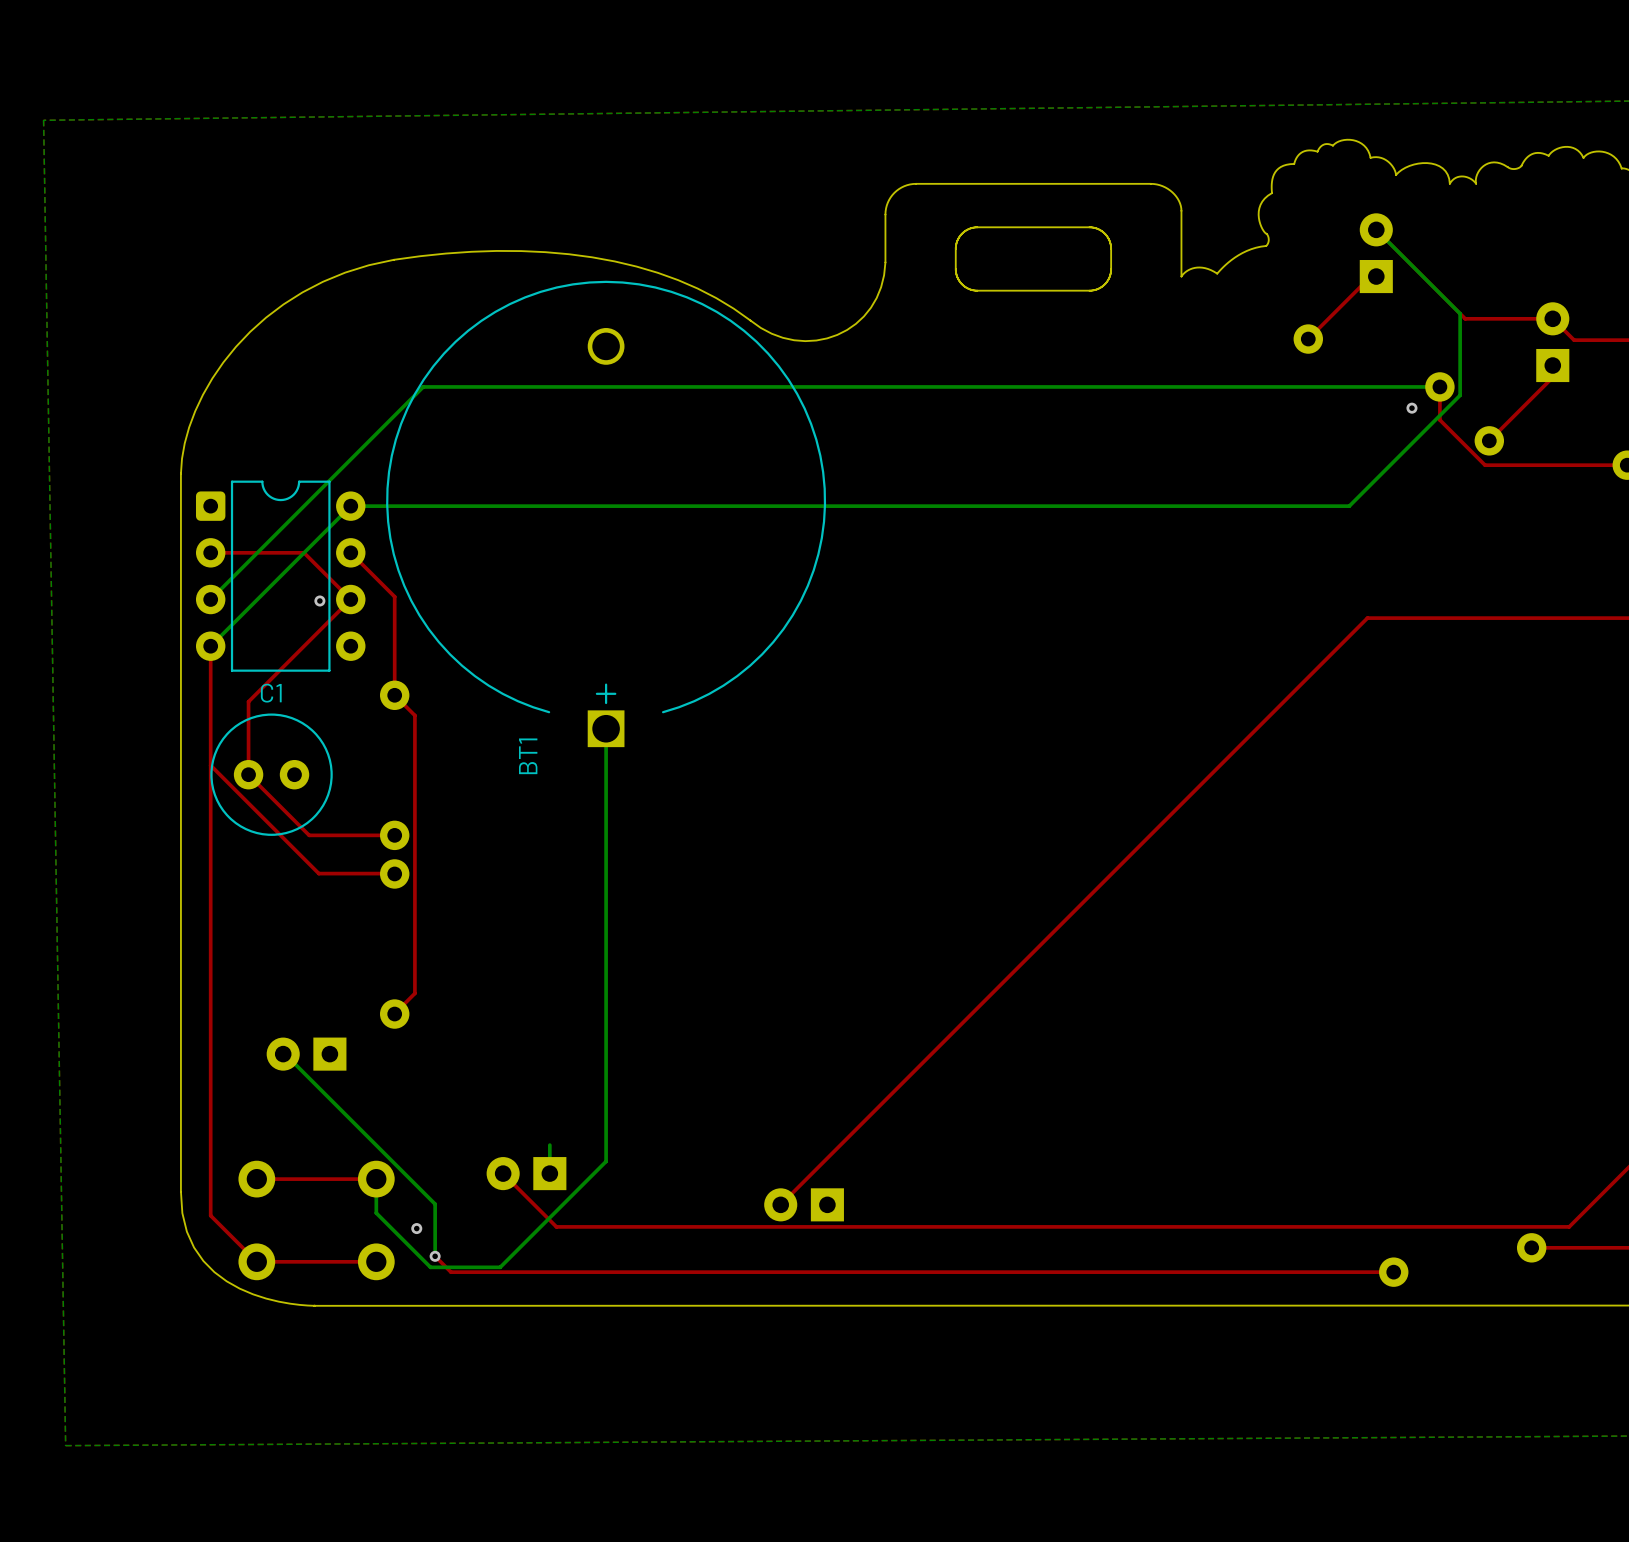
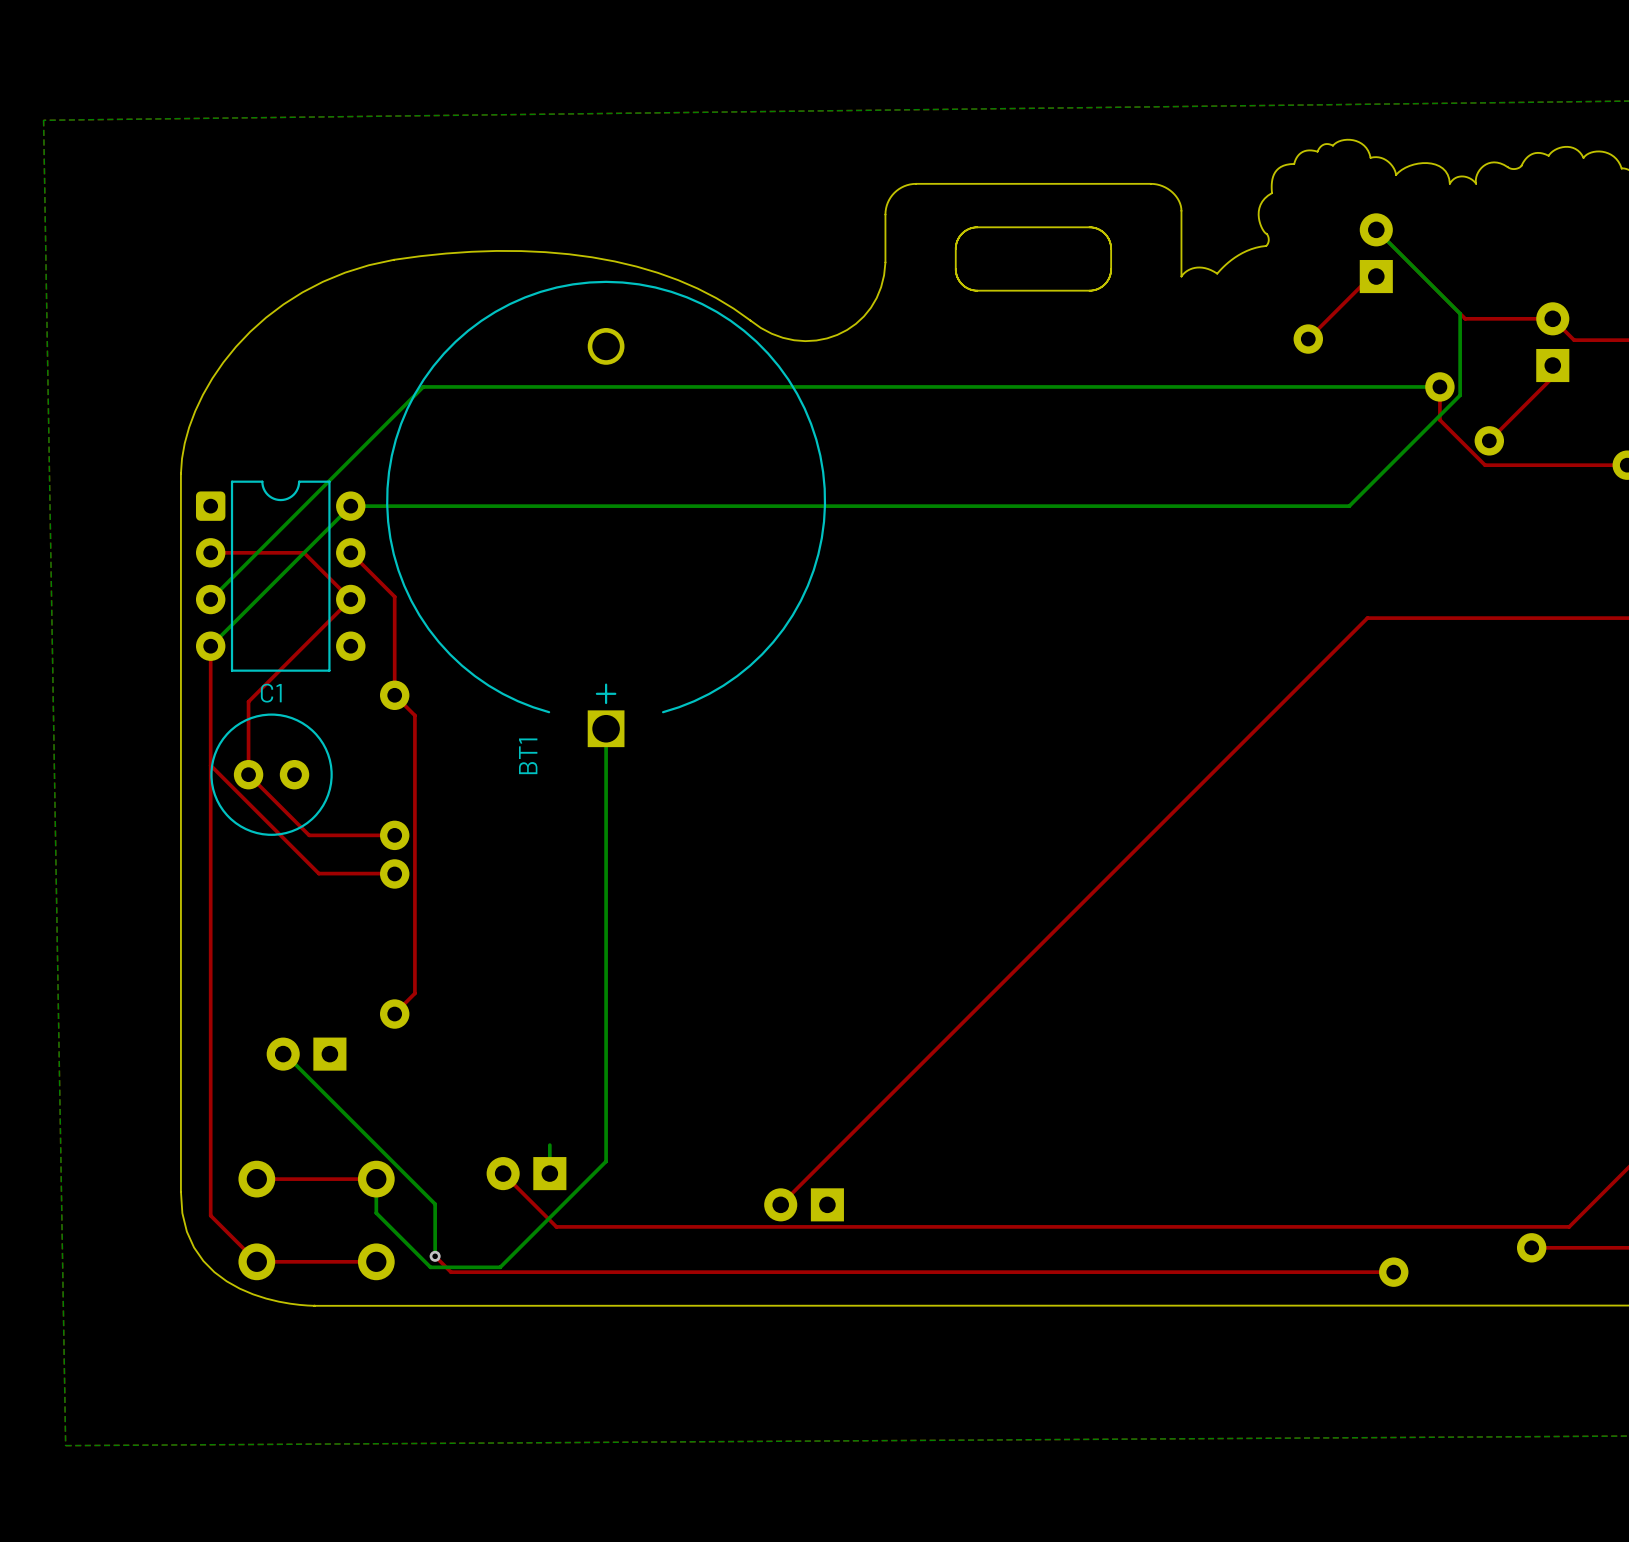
via: (1411, 408) -> none
via: (319, 600) -> none
via: (416, 1228) -> none

